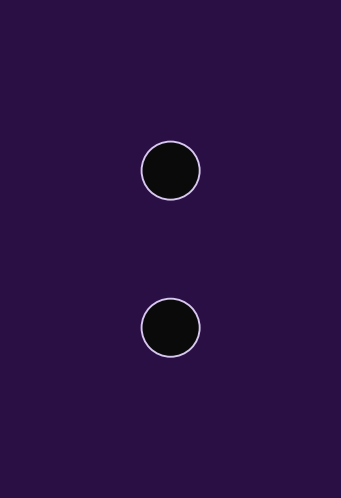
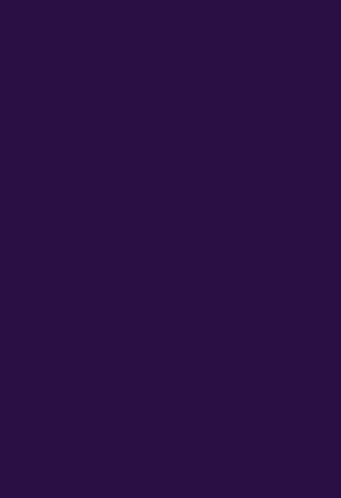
part: (170, 170) -> none
part: (170, 327) -> none

